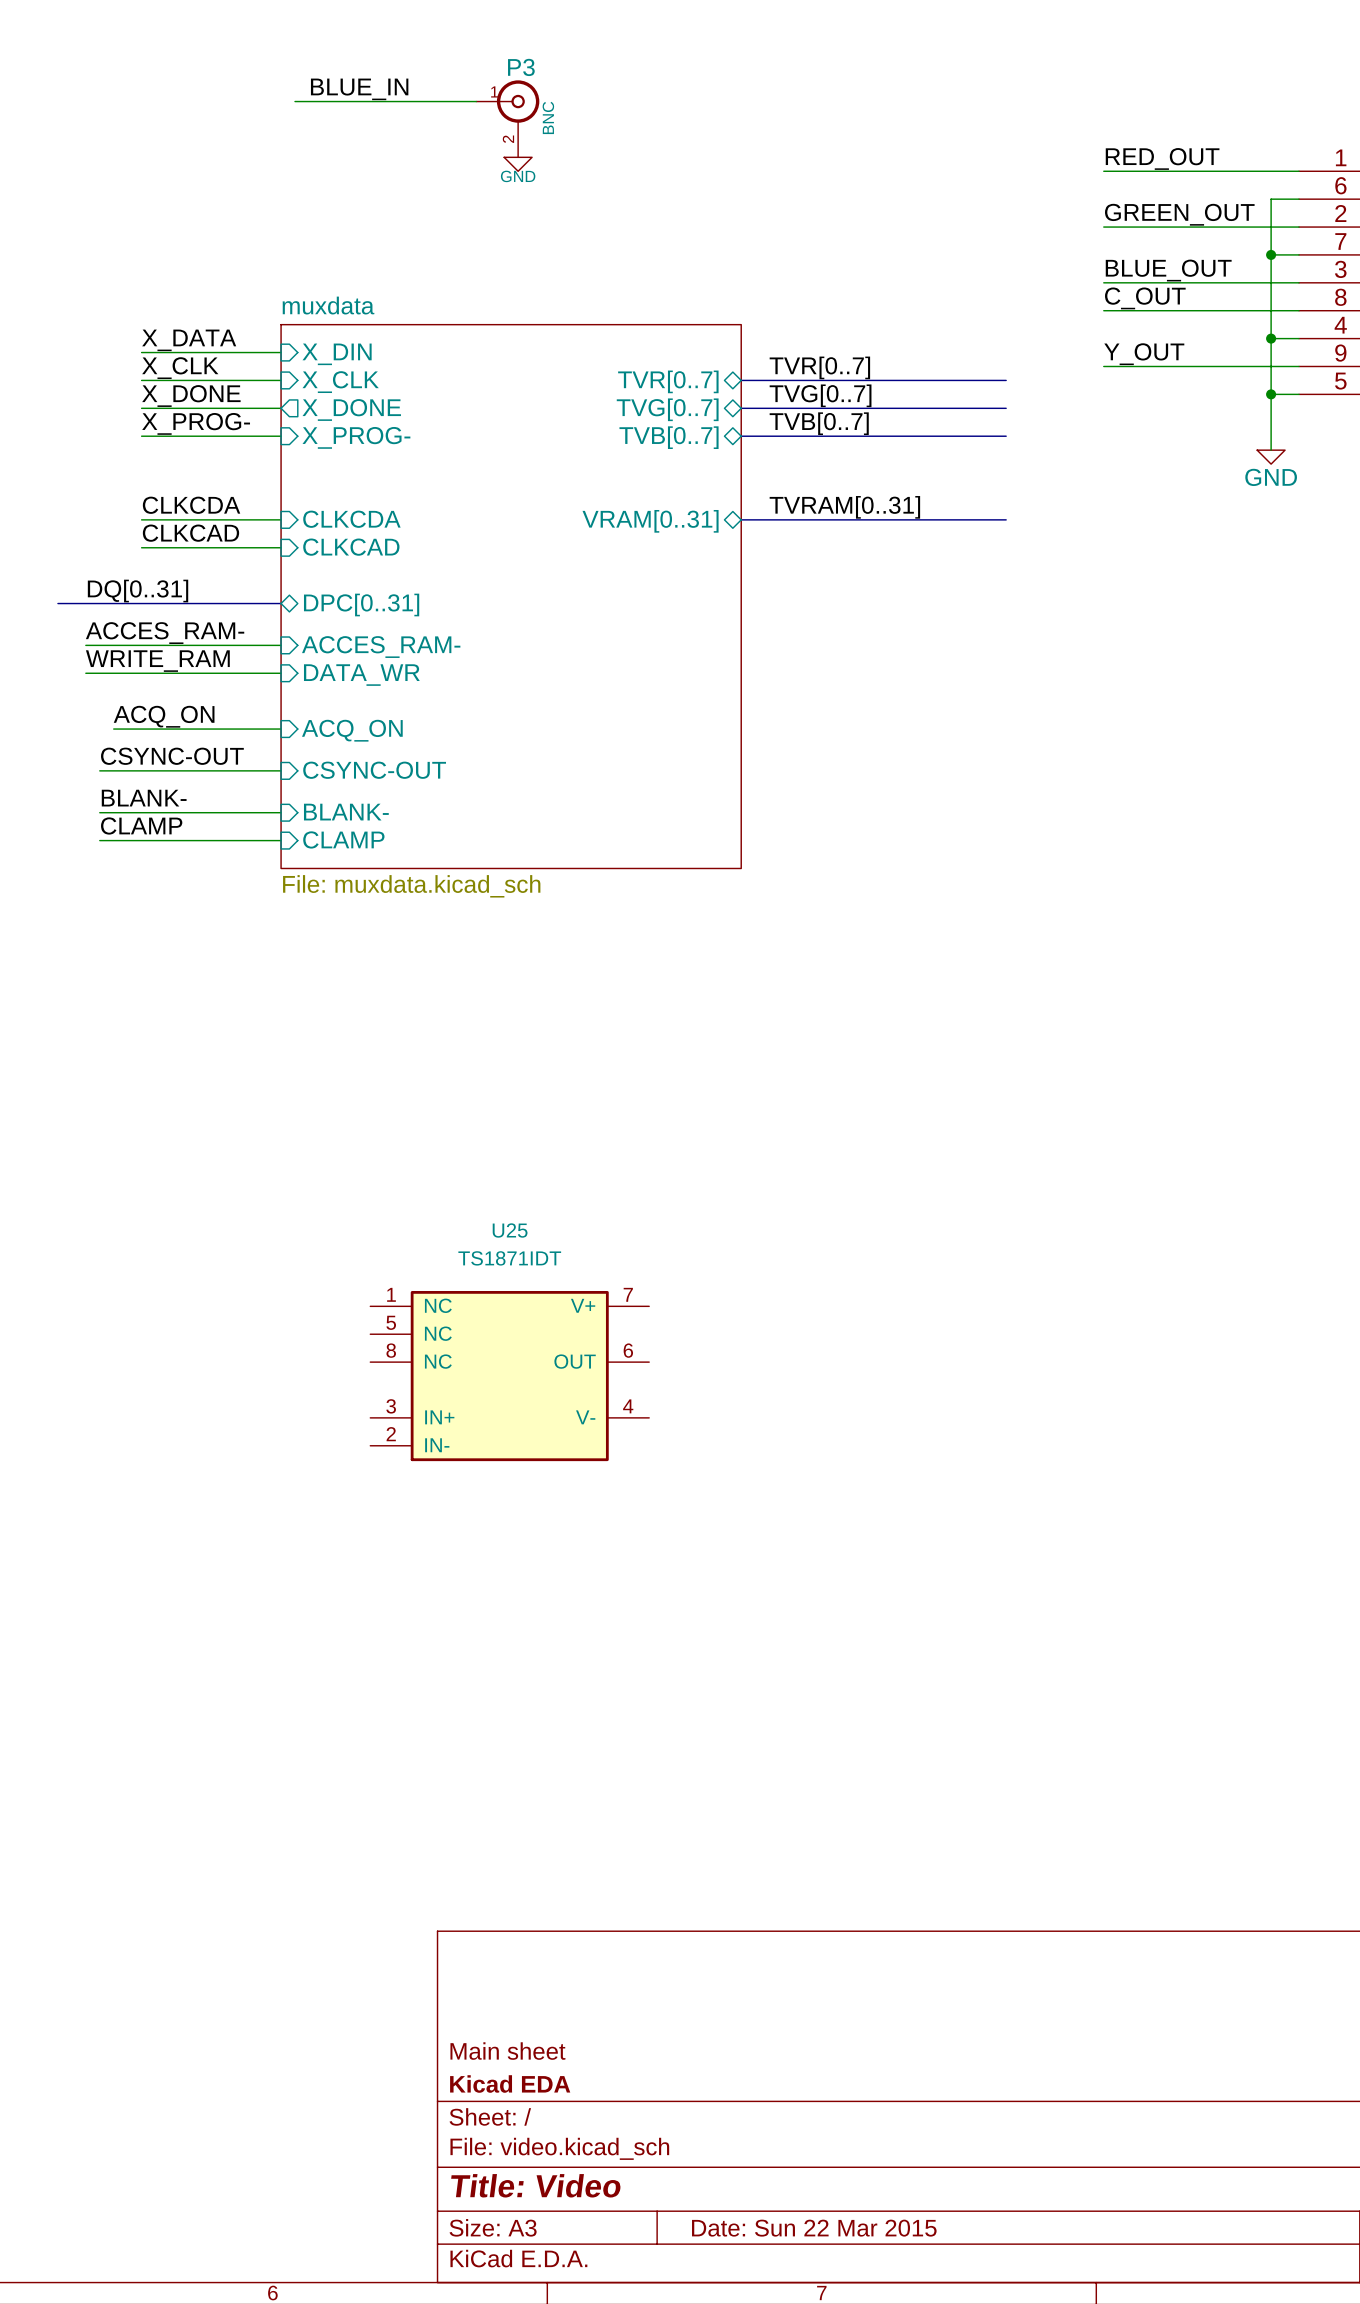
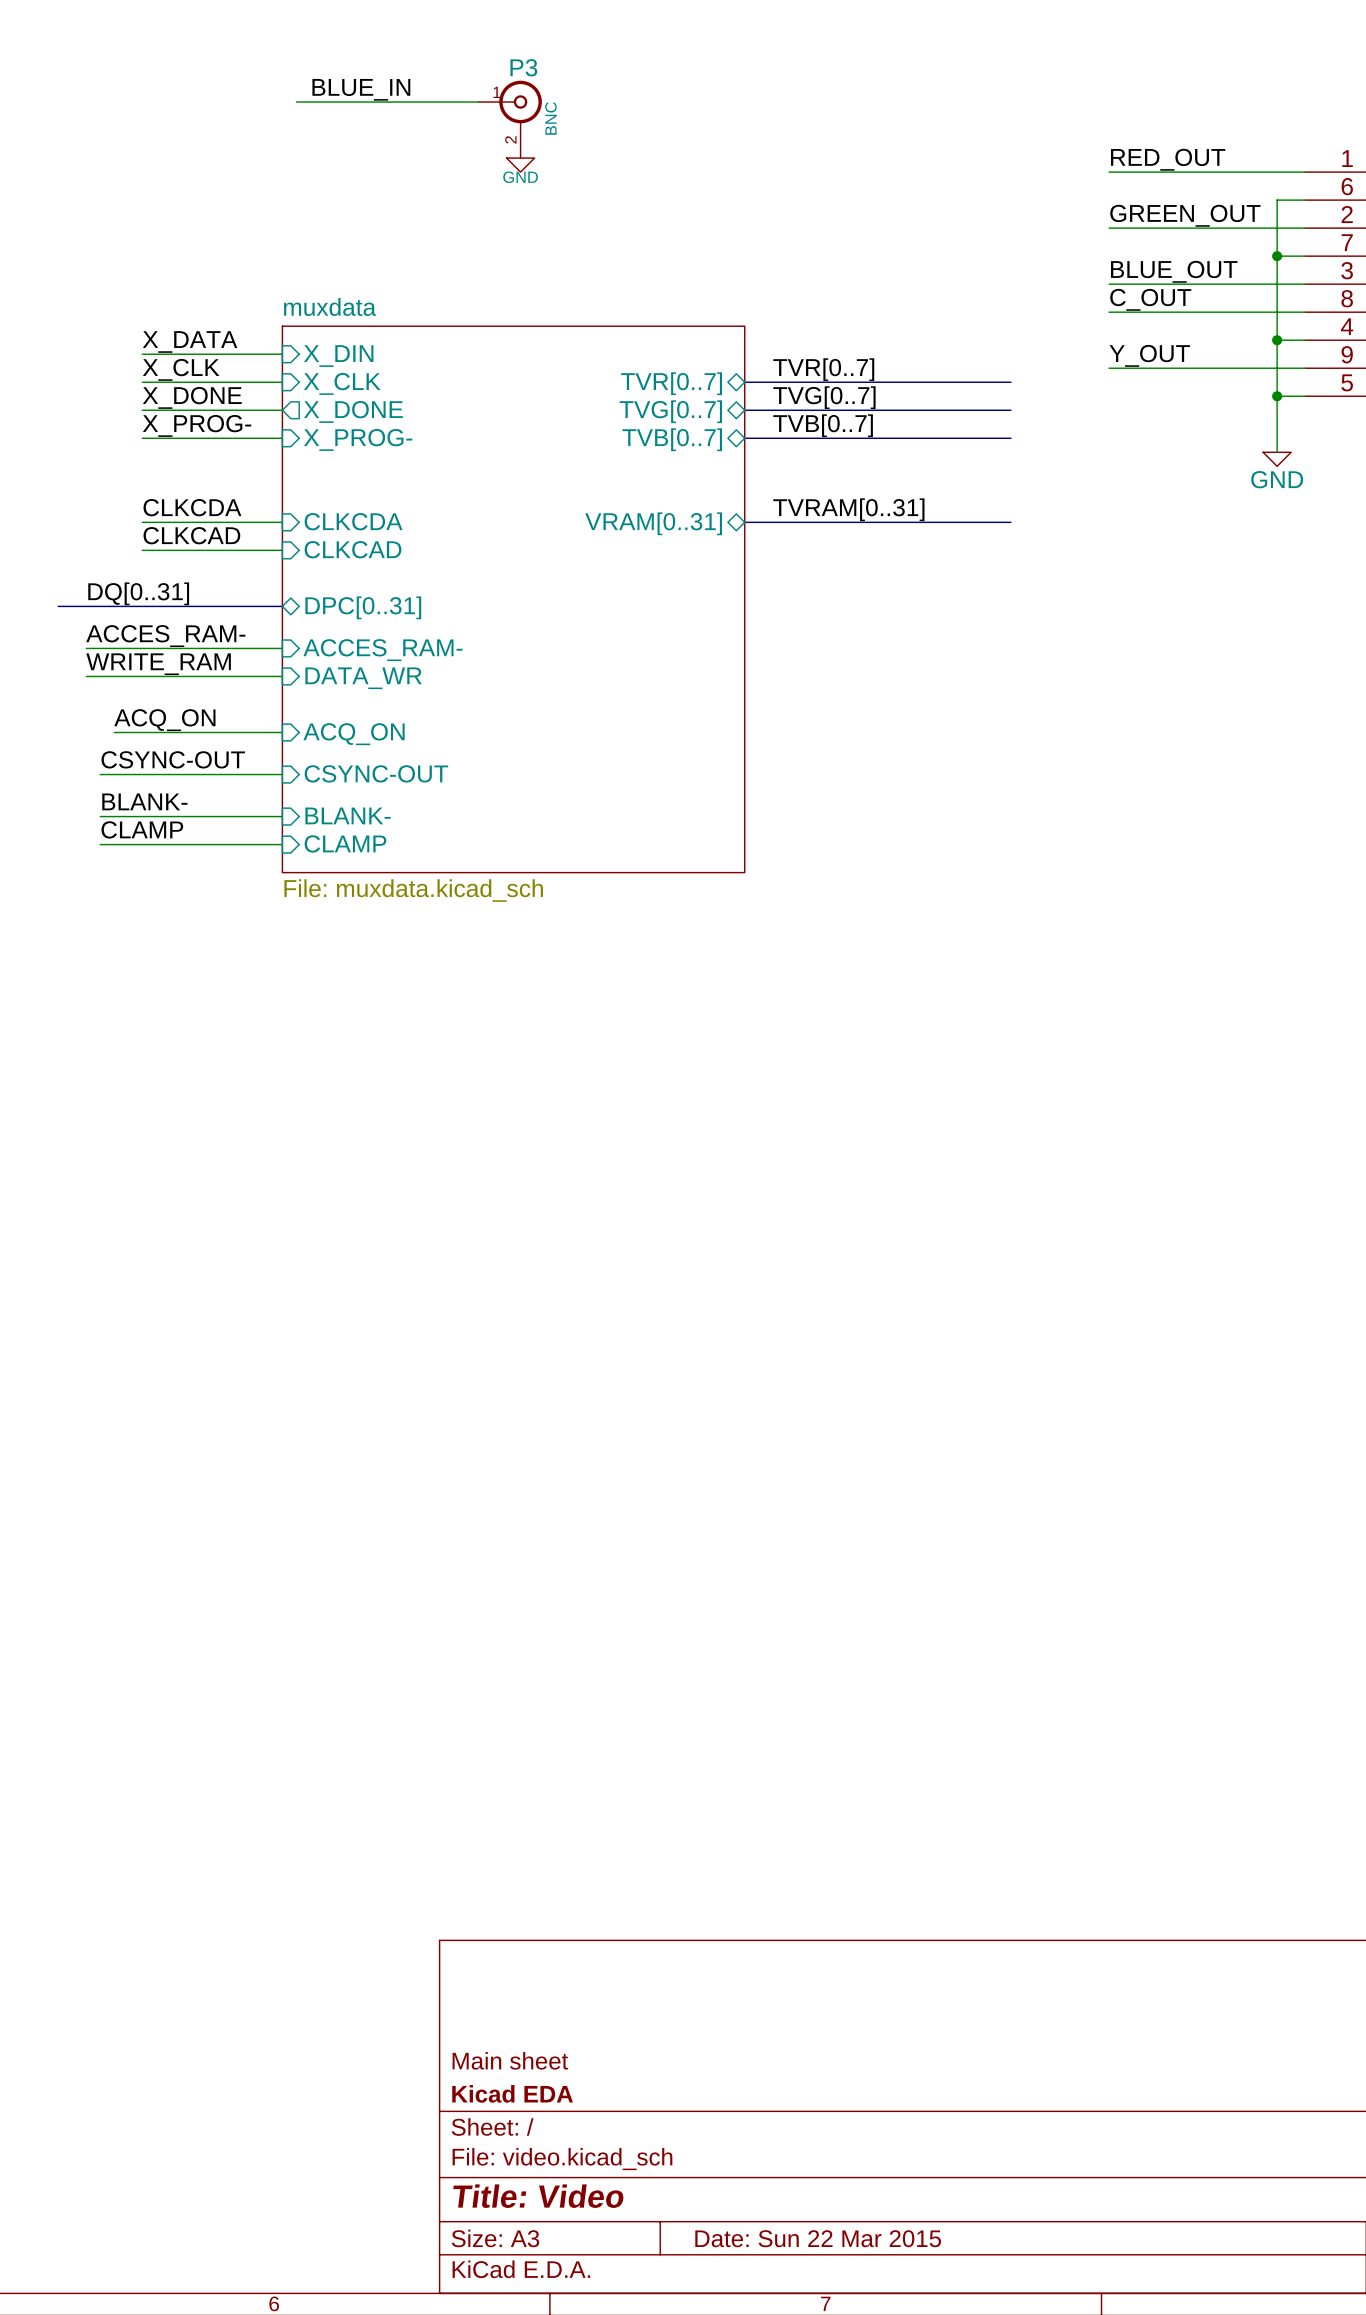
U25: TS1871IDT (509, 1376) -> none

